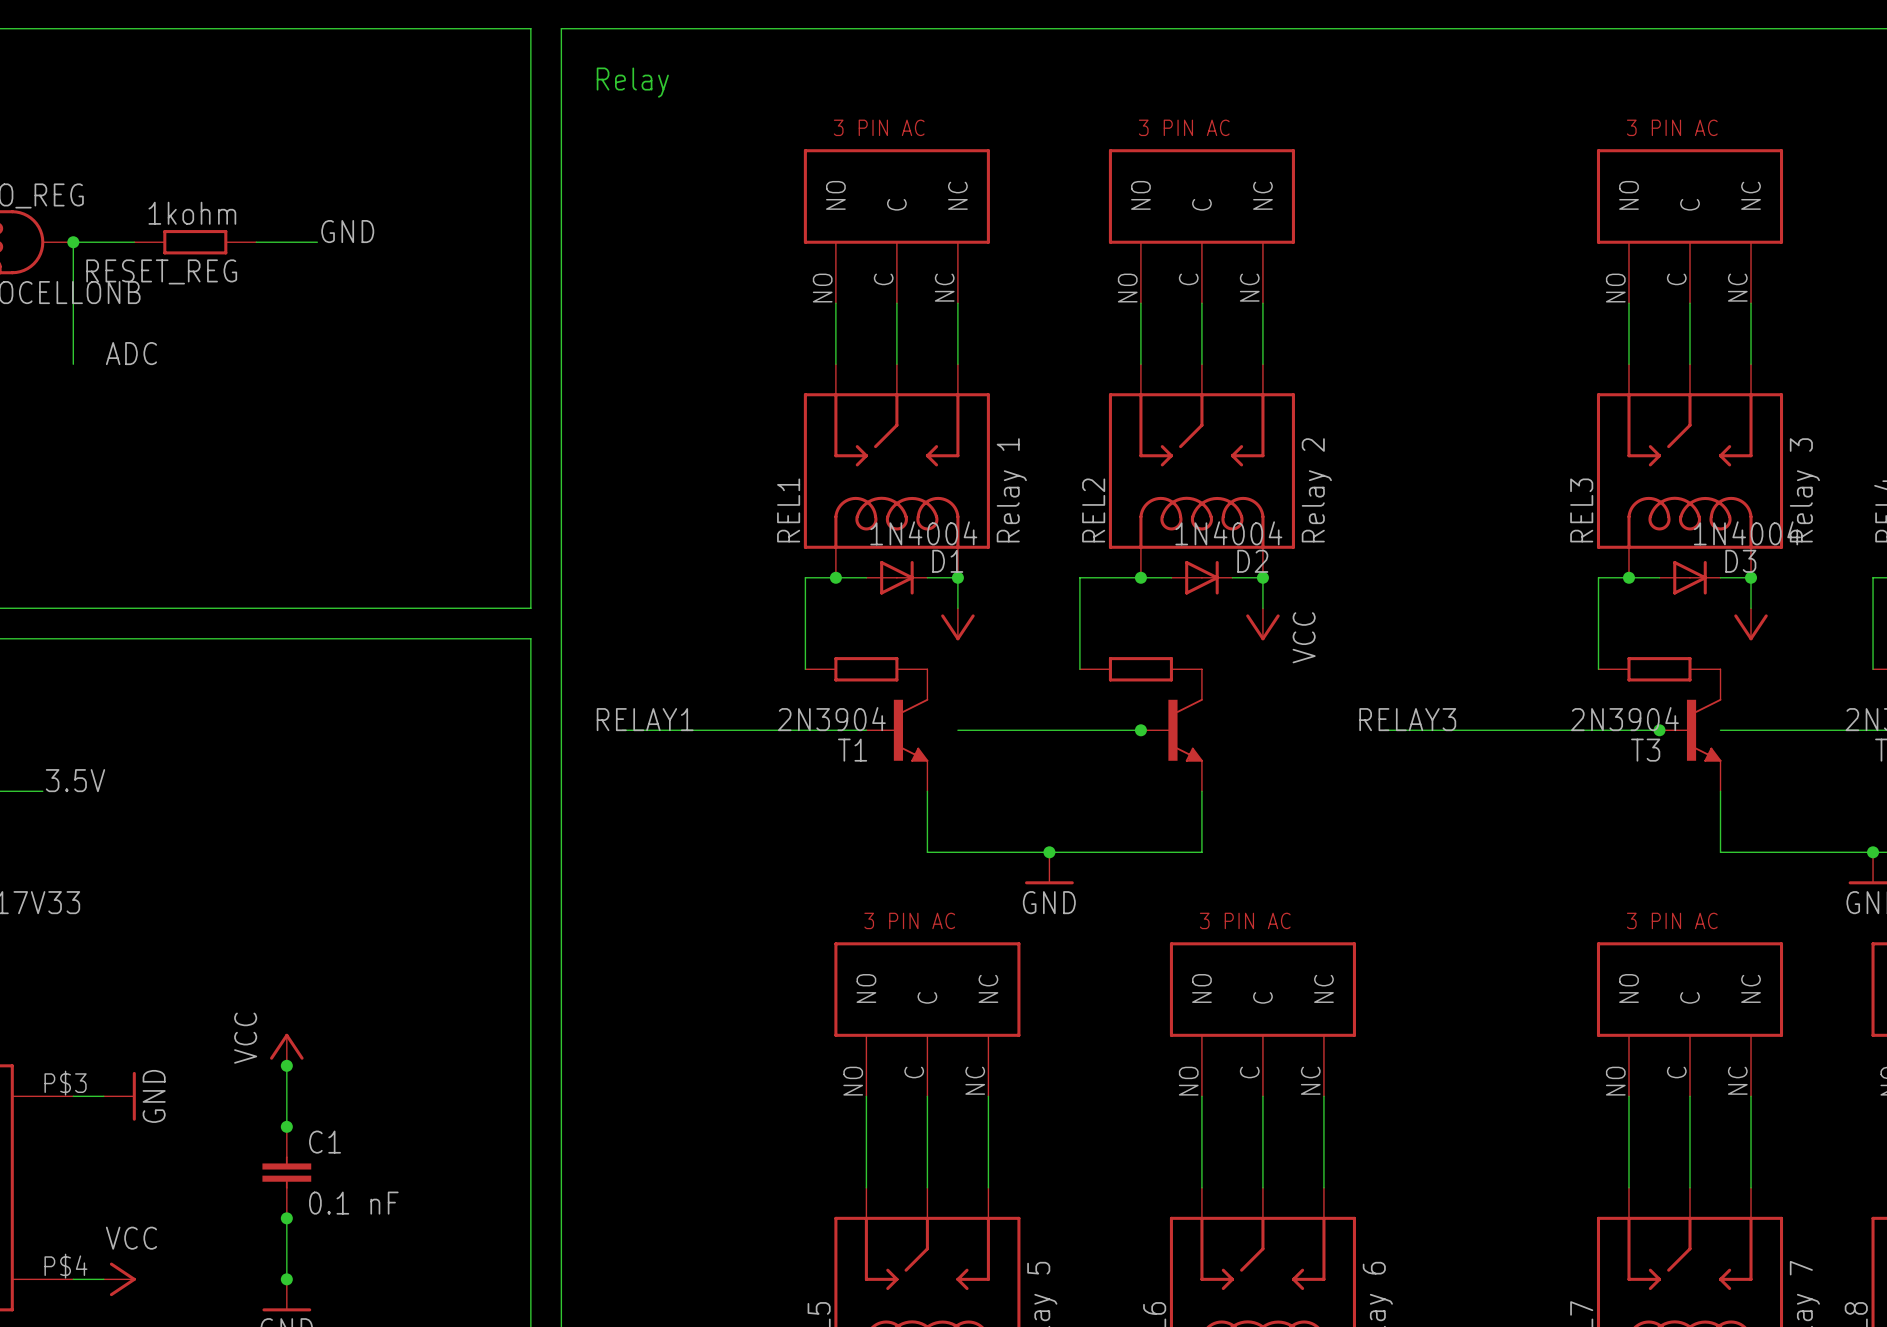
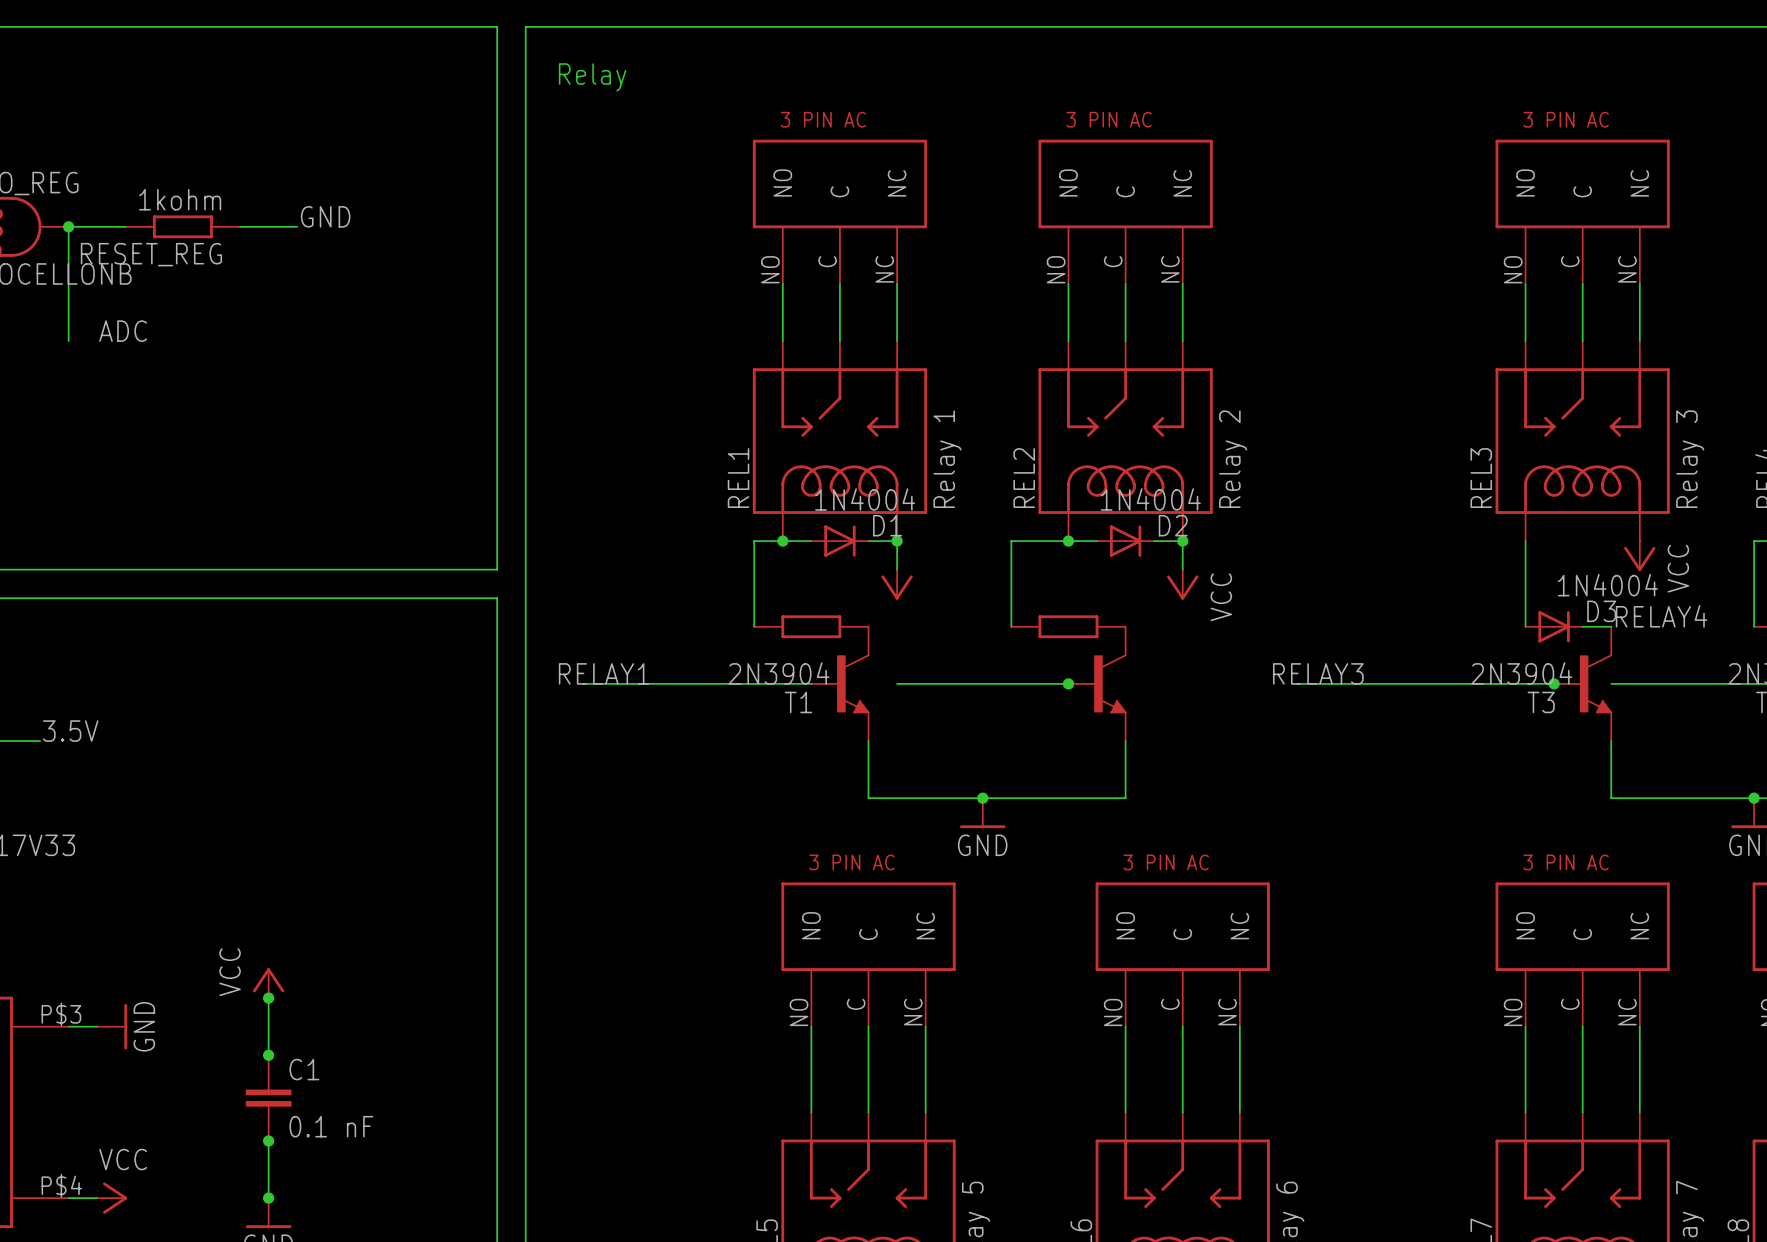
wire: none -> (1525, 541) (1525, 626)
junction: (1628, 577) -> none
wire: (1659, 577) (1598, 577) (1598, 669) -> none
D3 position: (1690, 577) -> (1554, 626)
wire: (1720, 577) (1751, 577) (1751, 608) -> none
junction: (1751, 577) -> none
power symbol: none -> VCC (1639, 556)
power symbol: (1751, 624) -> none
label: none -> RELAY4 (1661, 616)
part: (1659, 669) -> none

